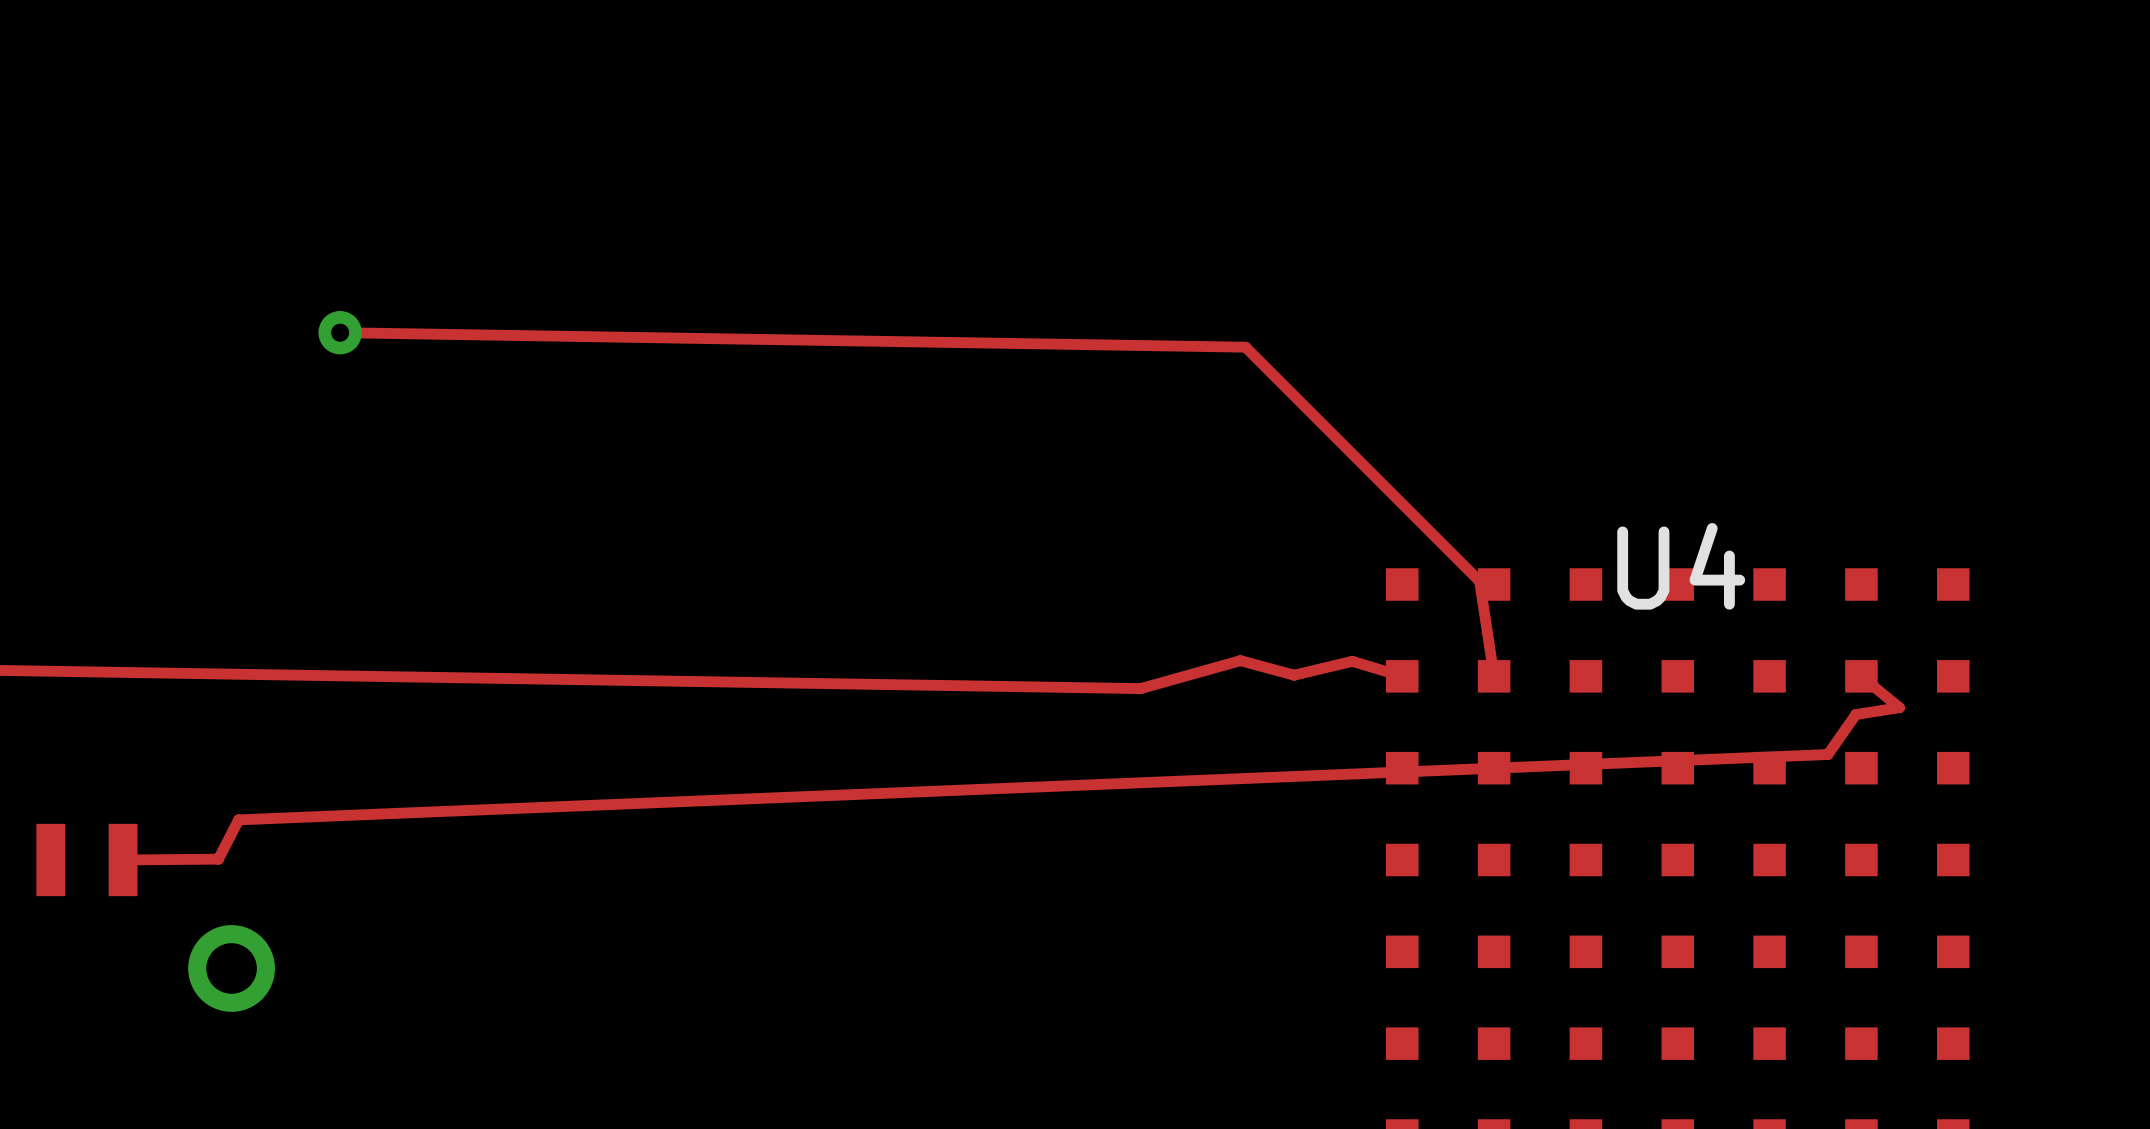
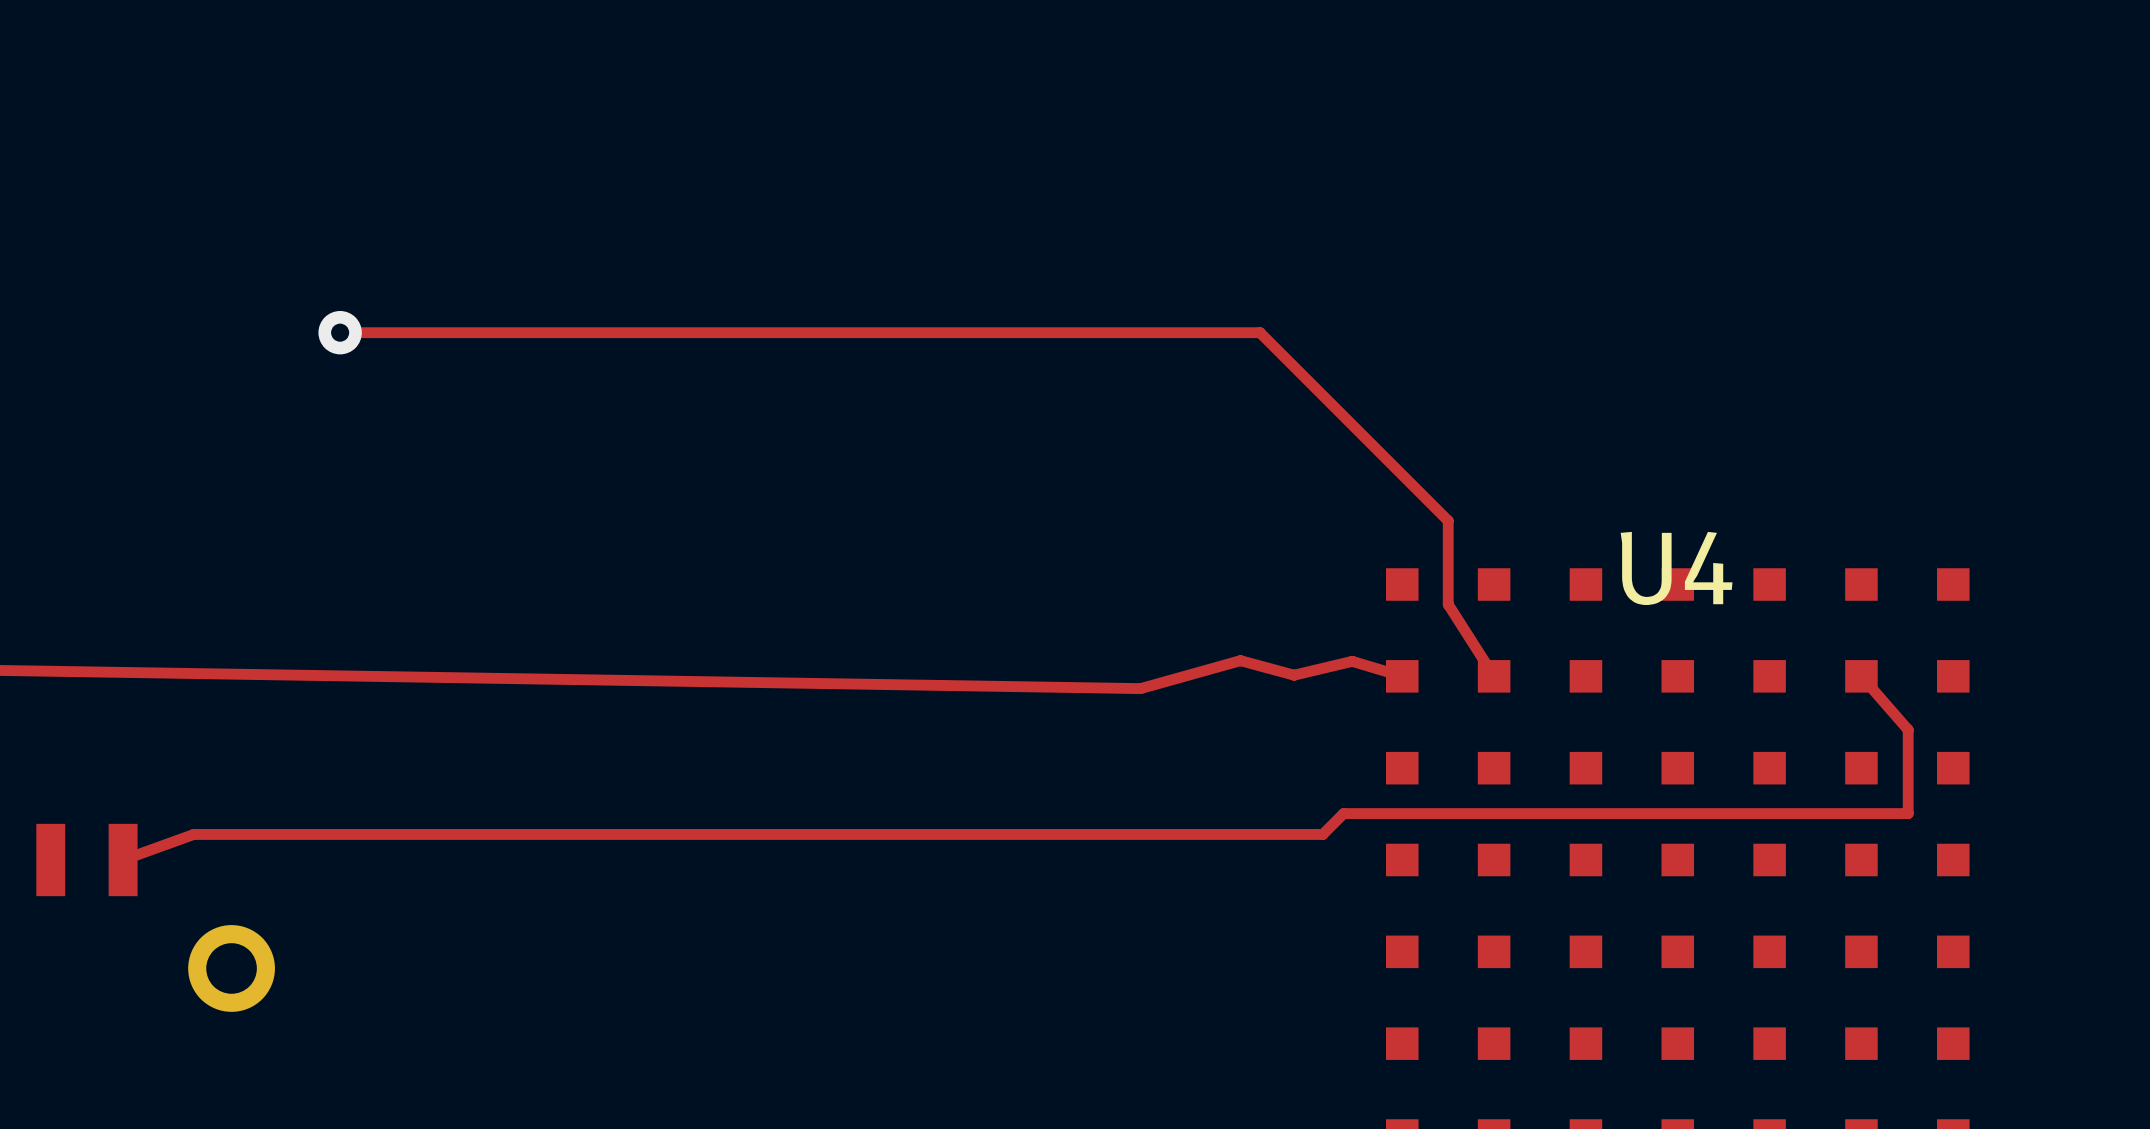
track: (340, 332) (1245, 347) (1479, 581) (1494, 676) -> (340, 332) (1260, 332) (1448, 520) (1448, 604) (1494, 676)
track: (1861, 676) (1899, 707) (1855, 714) (1827, 754) (238, 819) (218, 859) (123, 860) -> (1861, 676) (1908, 729) (1908, 813) (1343, 813) (1322, 834) (193, 834) (123, 860)

